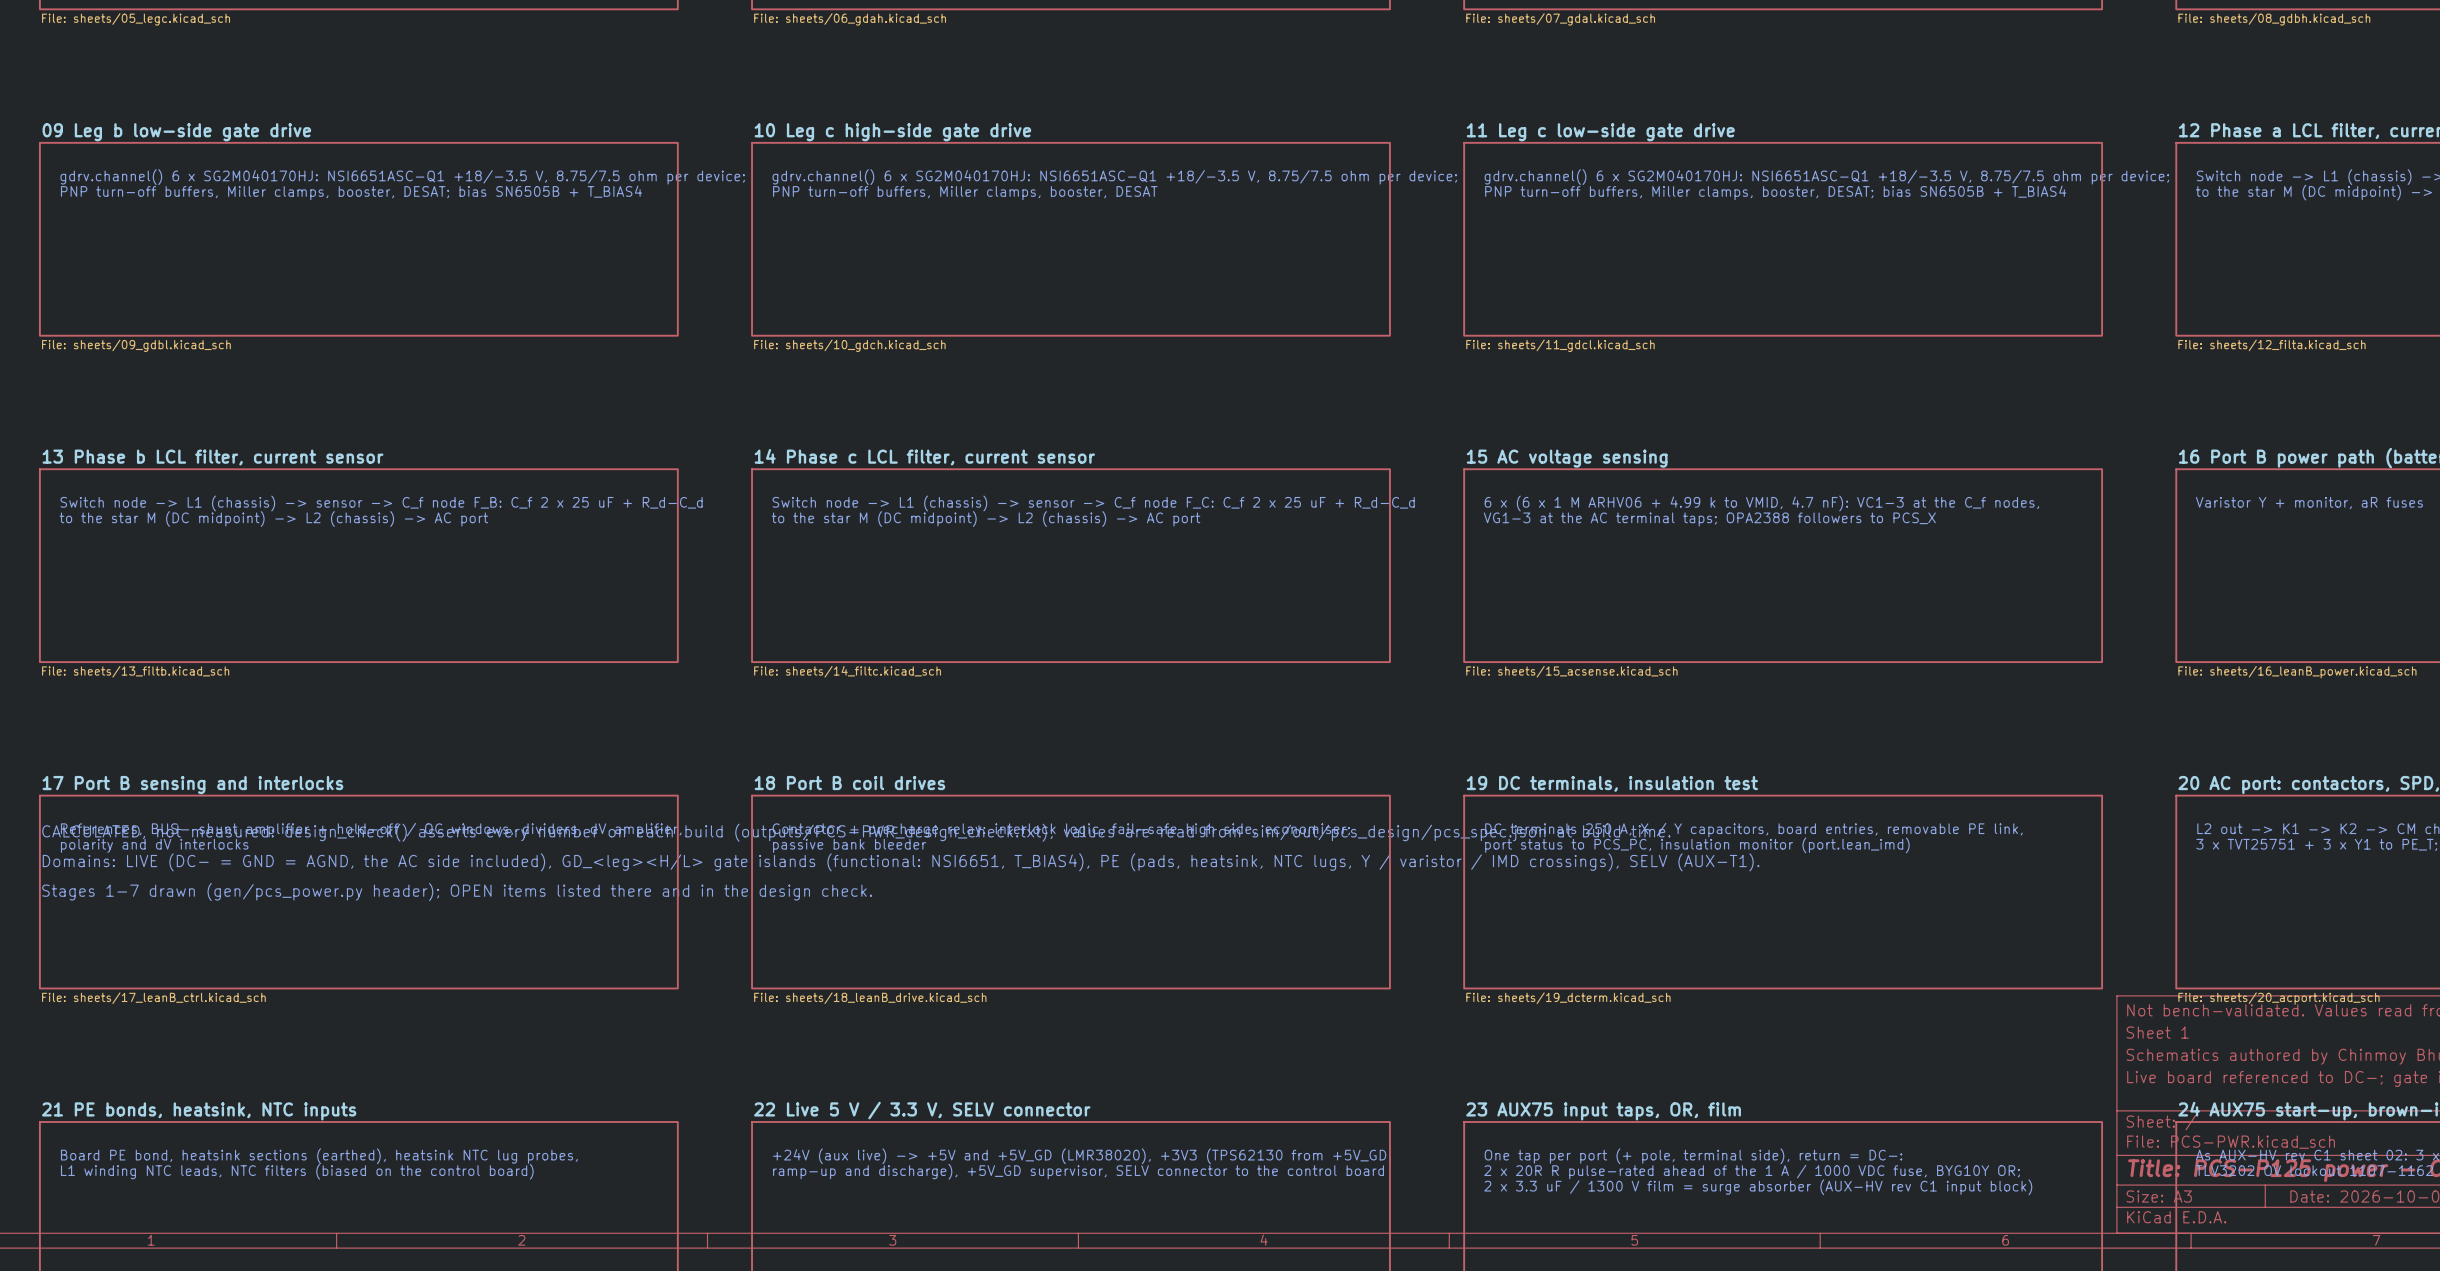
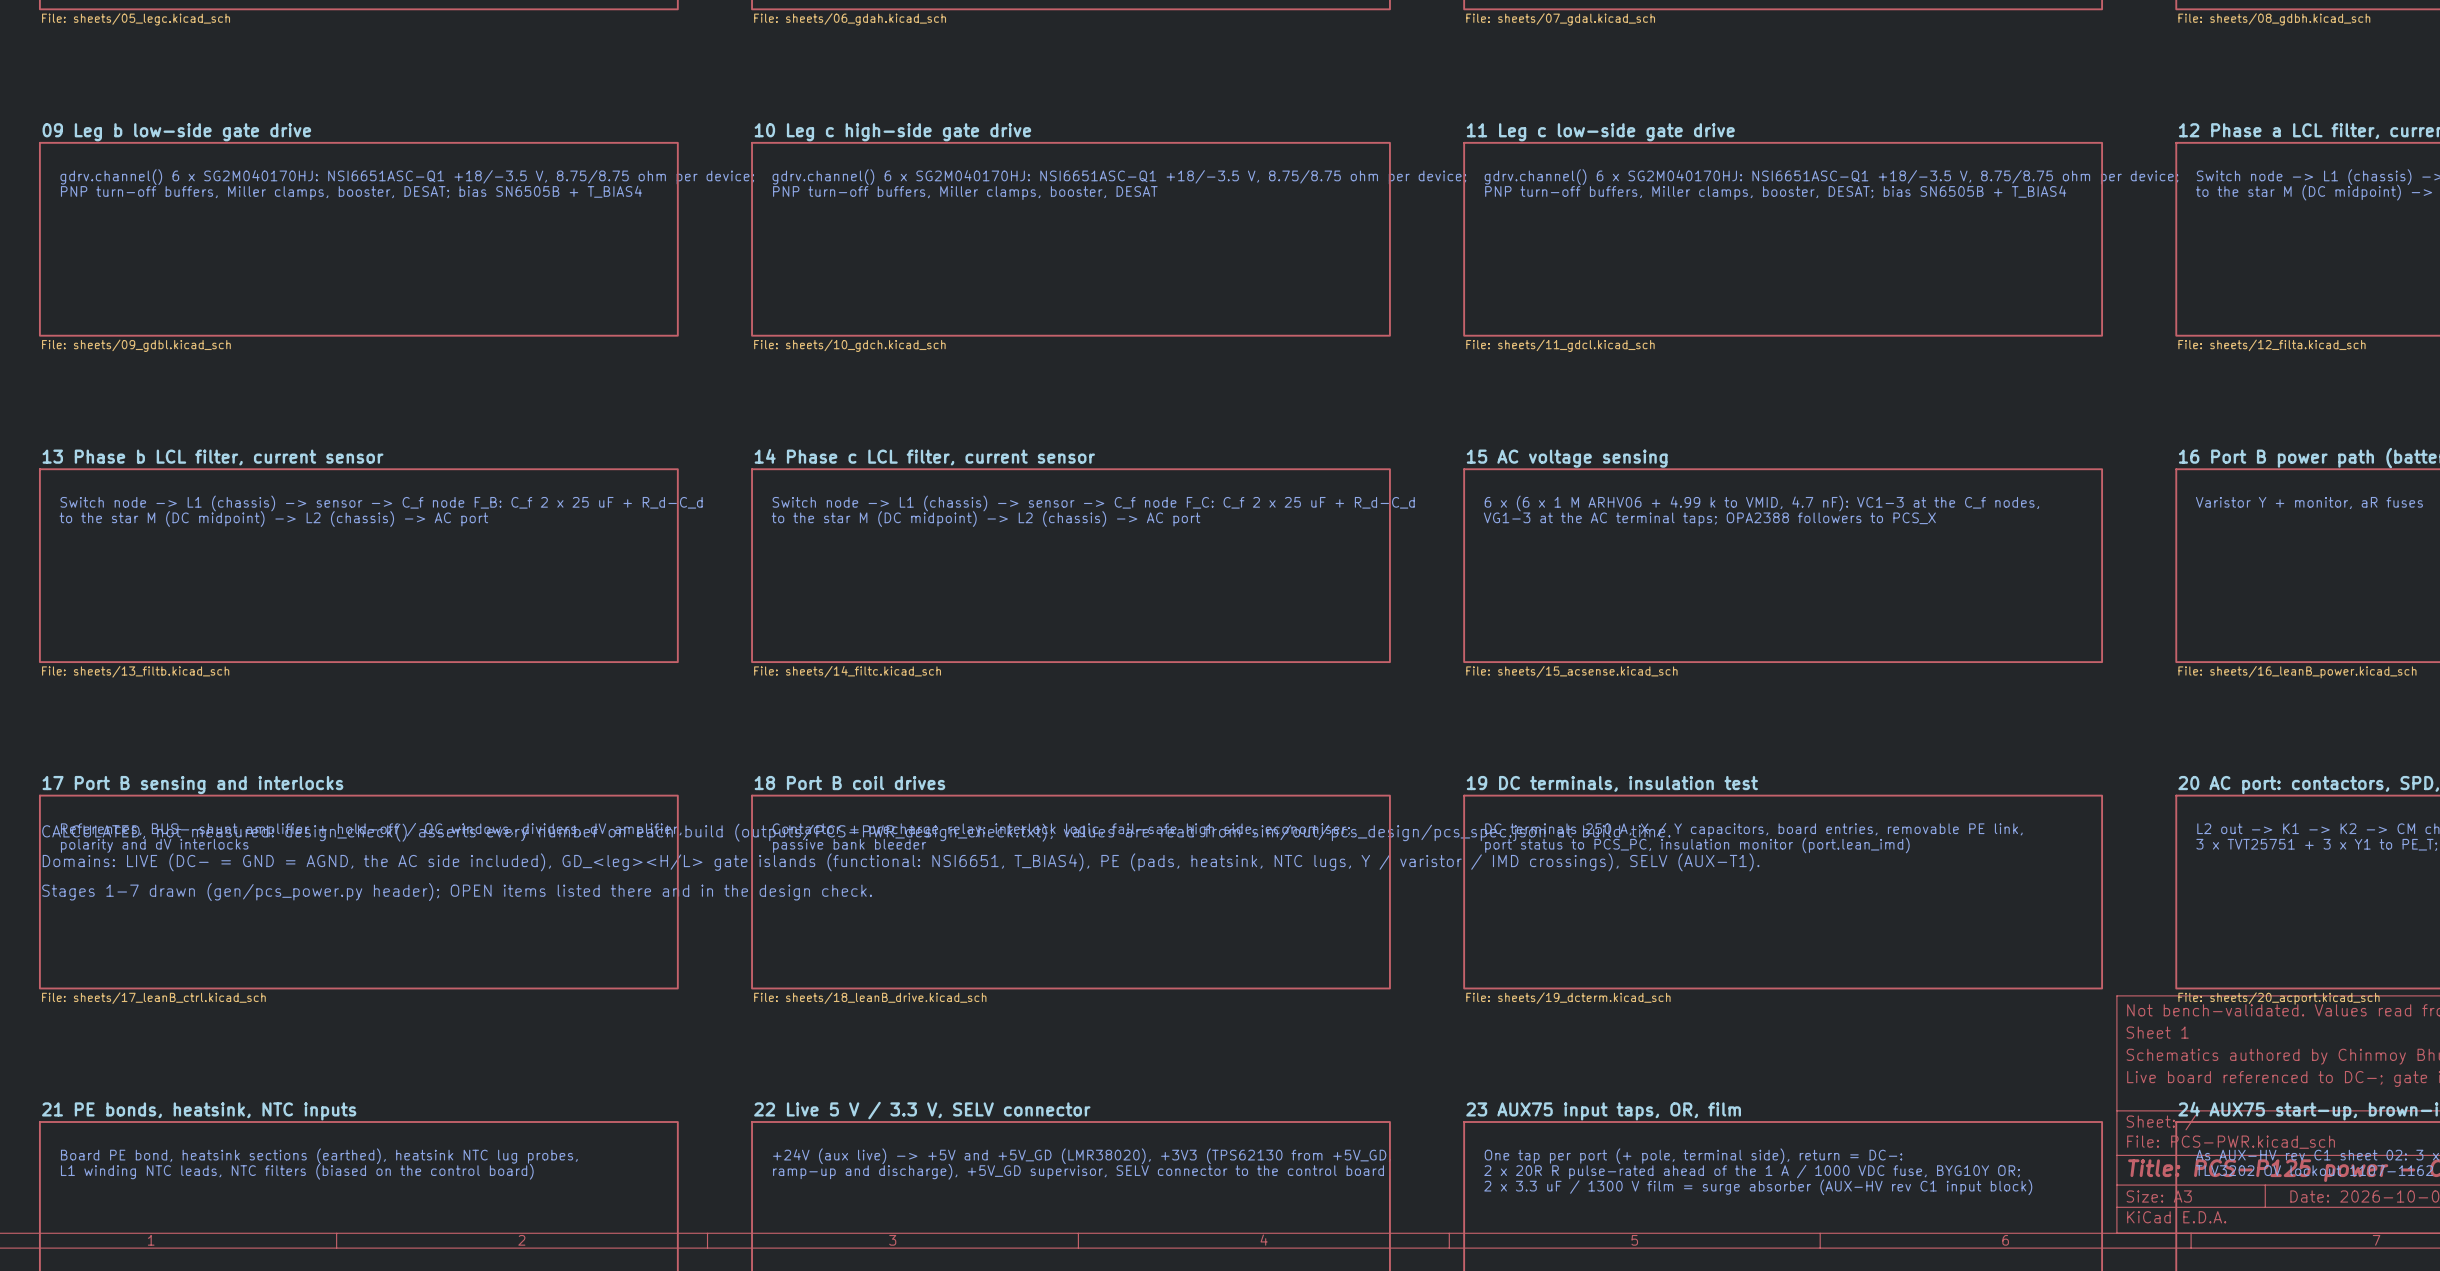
text: gdrv.channel() 6 x SG2M040170HJ: NSI6651ASC-Q1 +18/-3.5 V, 8.75/7.5 ohm per device; (402, 177) -> gdrv.channel() 6 x SG2M040170HJ: NSI6651ASC-Q1 +18/-3.5 V, 8.75/8.75 ohm per device; (407, 177)
text: gdrv.channel() 6 x SG2M040170HJ: NSI6651ASC-Q1 +18/-3.5 V, 8.75/7.5 ohm per device; (1114, 177) -> gdrv.channel() 6 x SG2M040170HJ: NSI6651ASC-Q1 +18/-3.5 V, 8.75/8.75 ohm per device; (1119, 177)
text: gdrv.channel() 6 x SG2M040170HJ: NSI6651ASC-Q1 +18/-3.5 V, 8.75/7.5 ohm per device; (1826, 177) -> gdrv.channel() 6 x SG2M040170HJ: NSI6651ASC-Q1 +18/-3.5 V, 8.75/8.75 ohm per device; (1831, 177)

